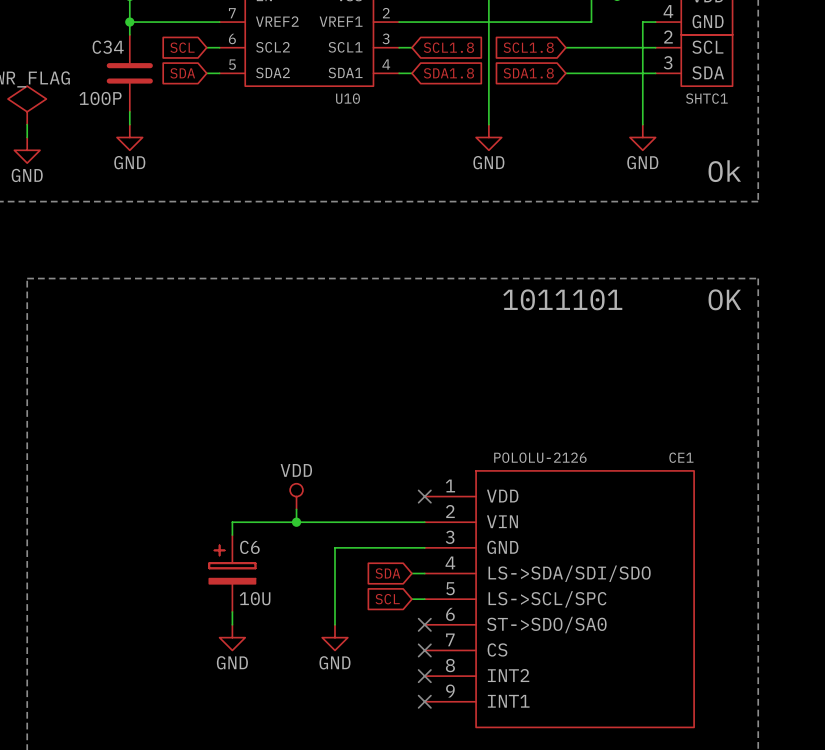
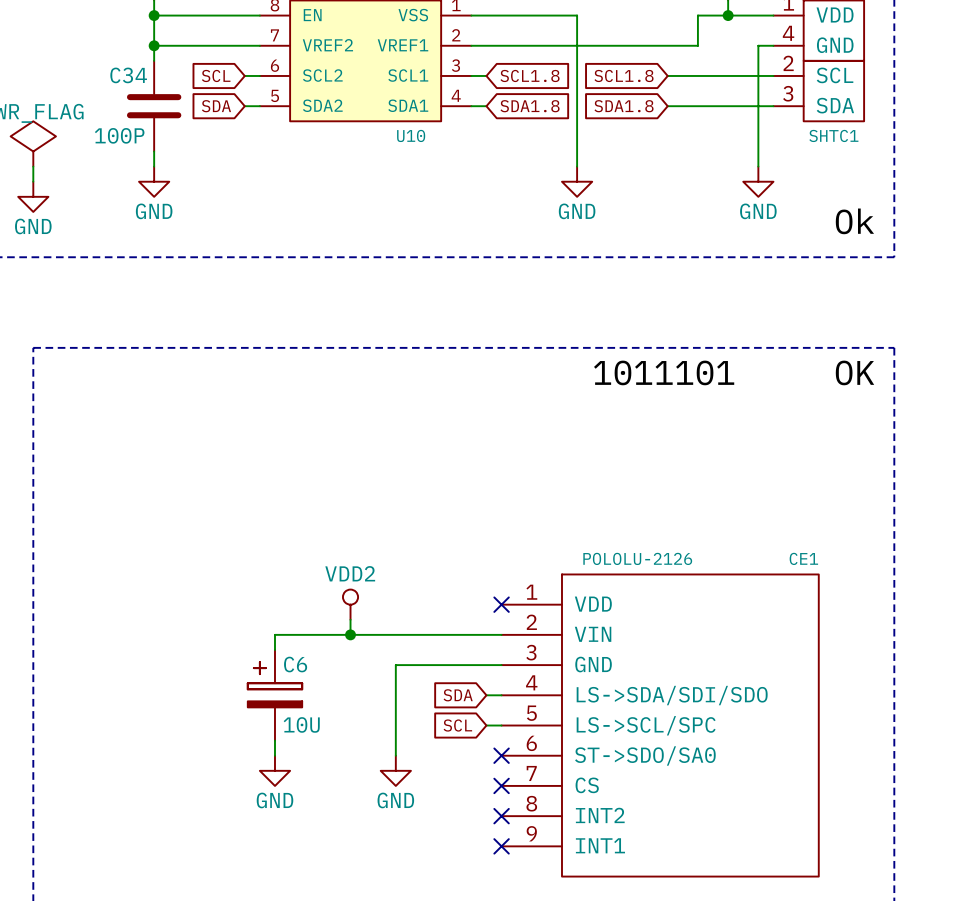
power symbol: VDD (296, 496) -> VDD2 (350, 604)

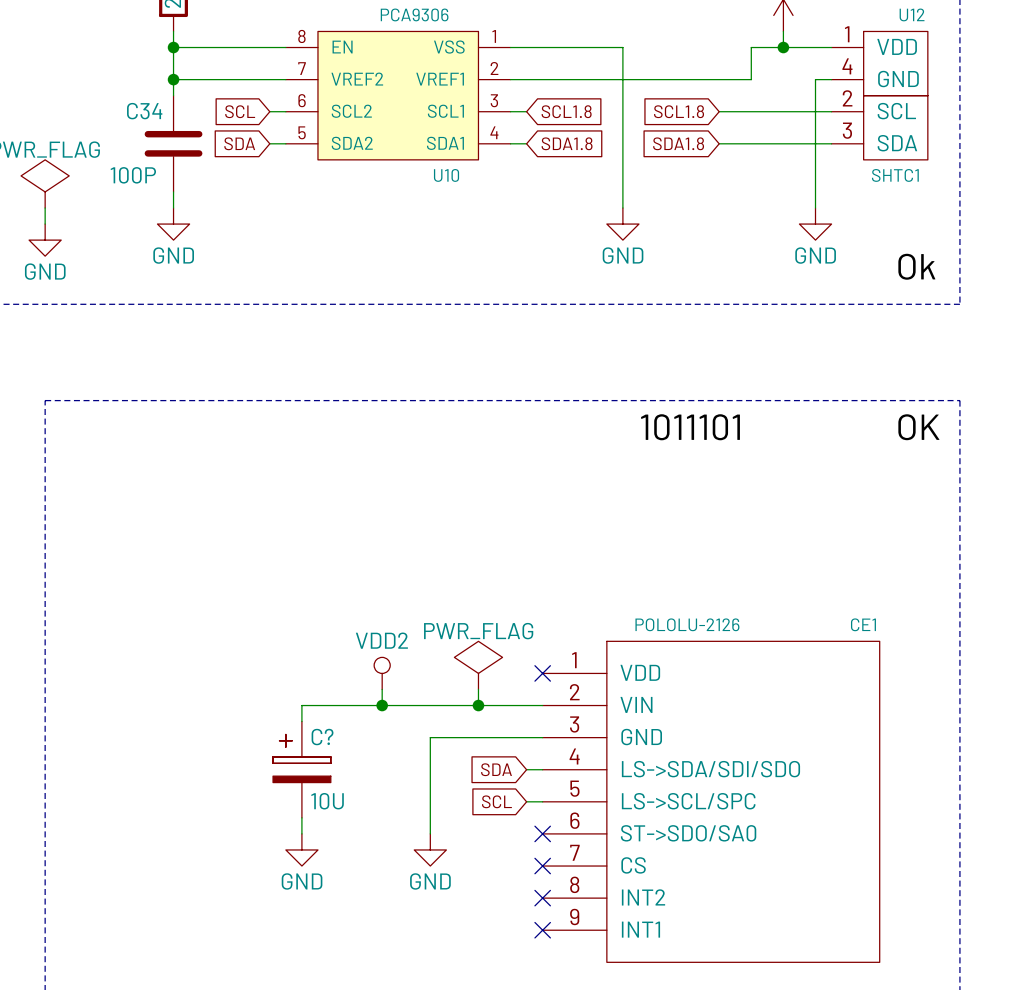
power symbol: none -> PWR_FLAG (478, 665)
wire: none -> (478, 689) (478, 705)
junction: none -> (478, 705)
C6 name: C6 (295, 664) -> C? (322, 737)

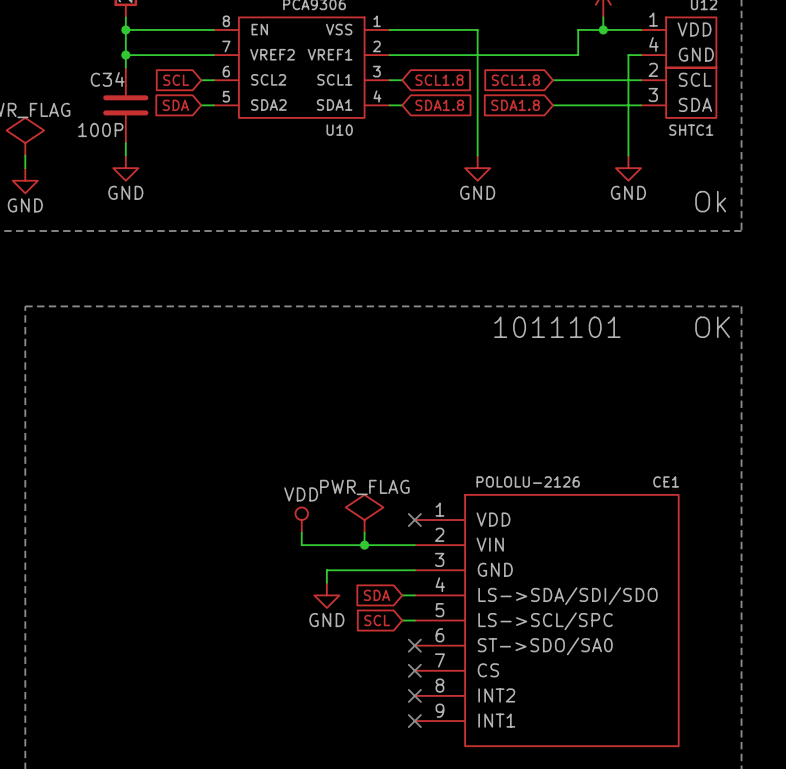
power symbol: VDD2 (382, 673) -> none
power symbol: none -> VDD (301, 520)
wire: (382, 689) (382, 705) -> none
junction: (382, 705) -> none
wire: (398, 705) (301, 705) (301, 721) -> (301, 545) (301, 532)
wire: (430, 753) (430, 833) -> none
C?: 10U (301, 769) -> none
power symbol: none -> GND (326, 595)
wire: (301, 817) (301, 833) -> none
power symbol: GND (301, 849) -> none
power symbol: GND (430, 849) -> none

